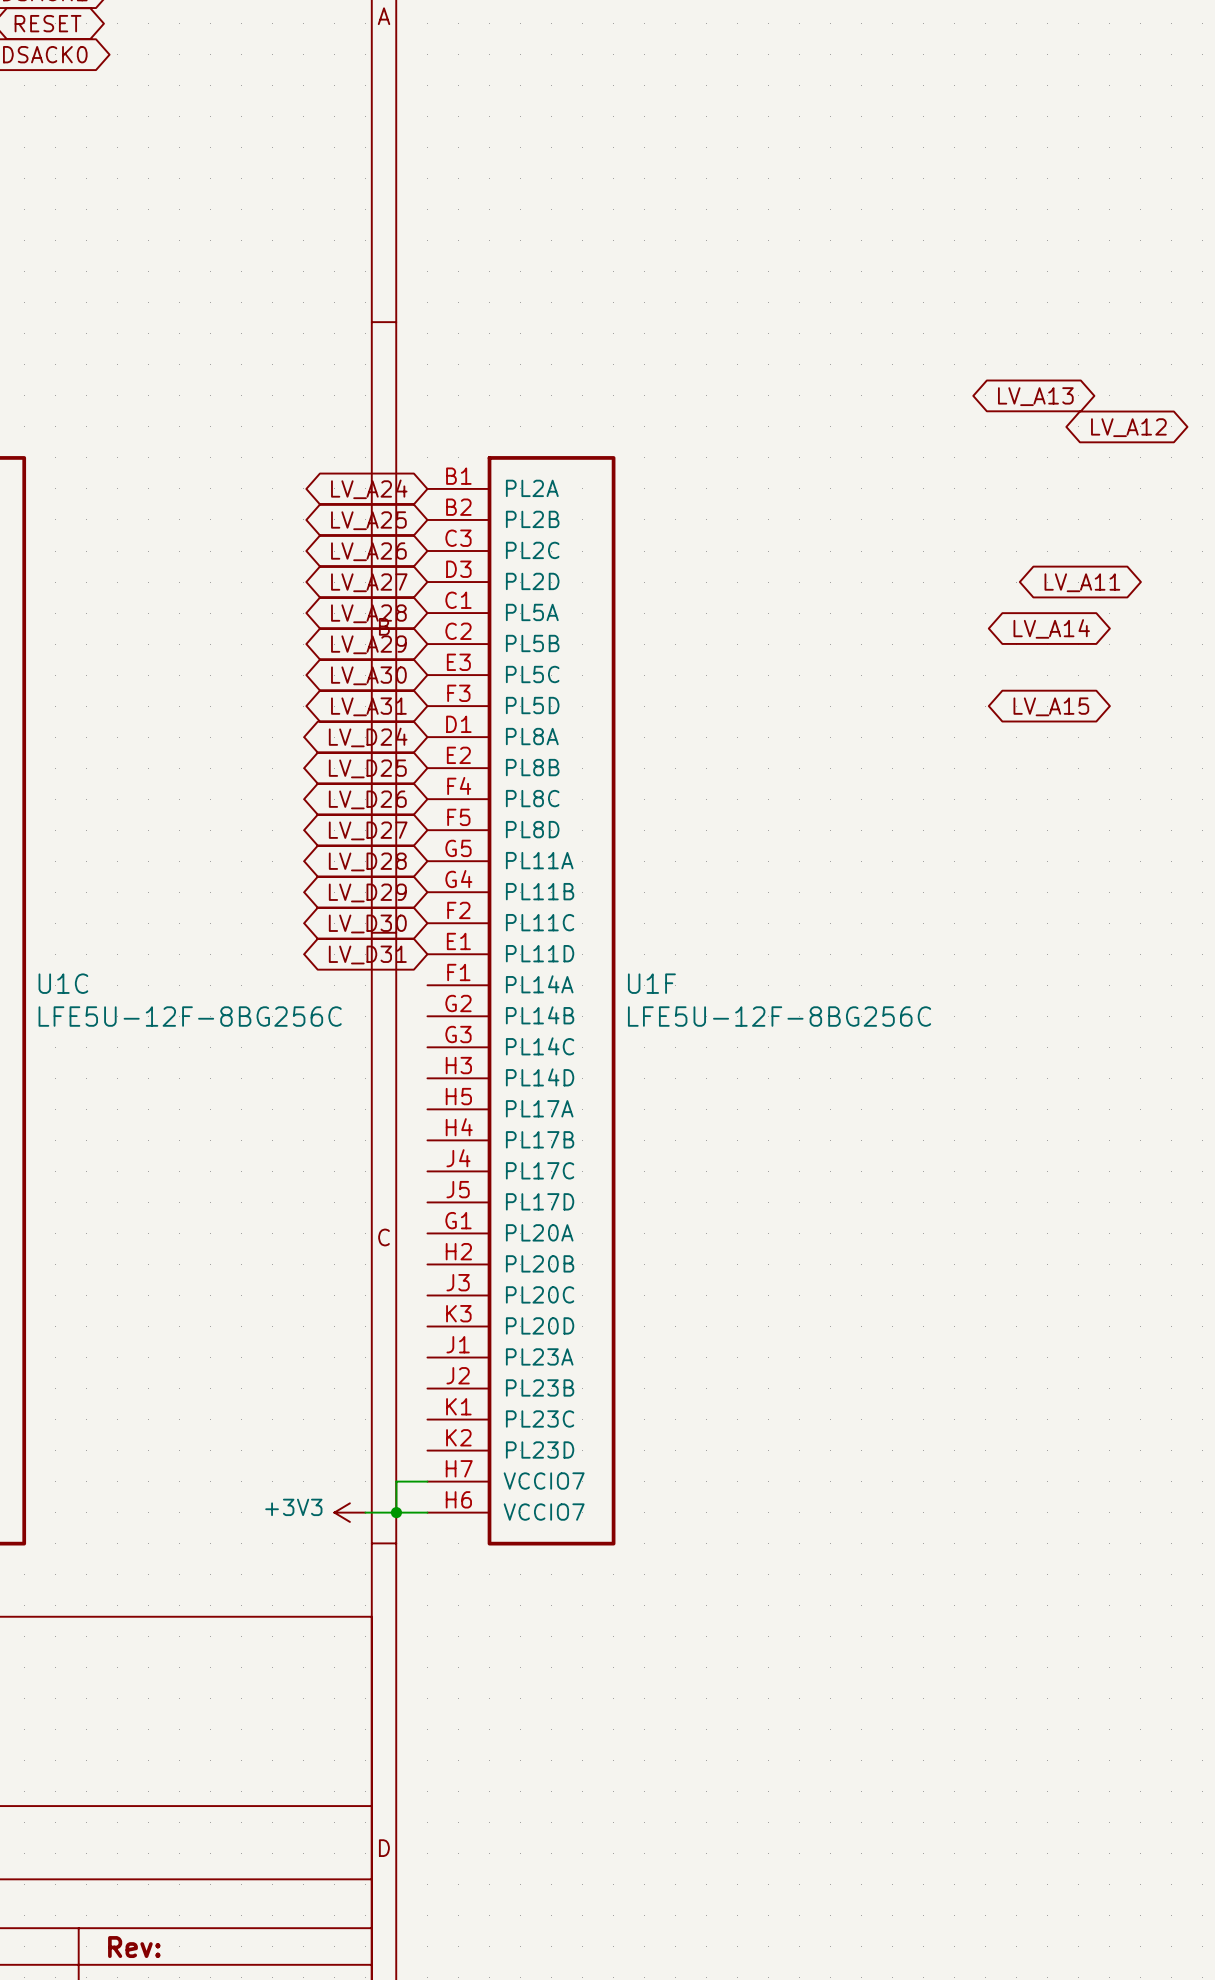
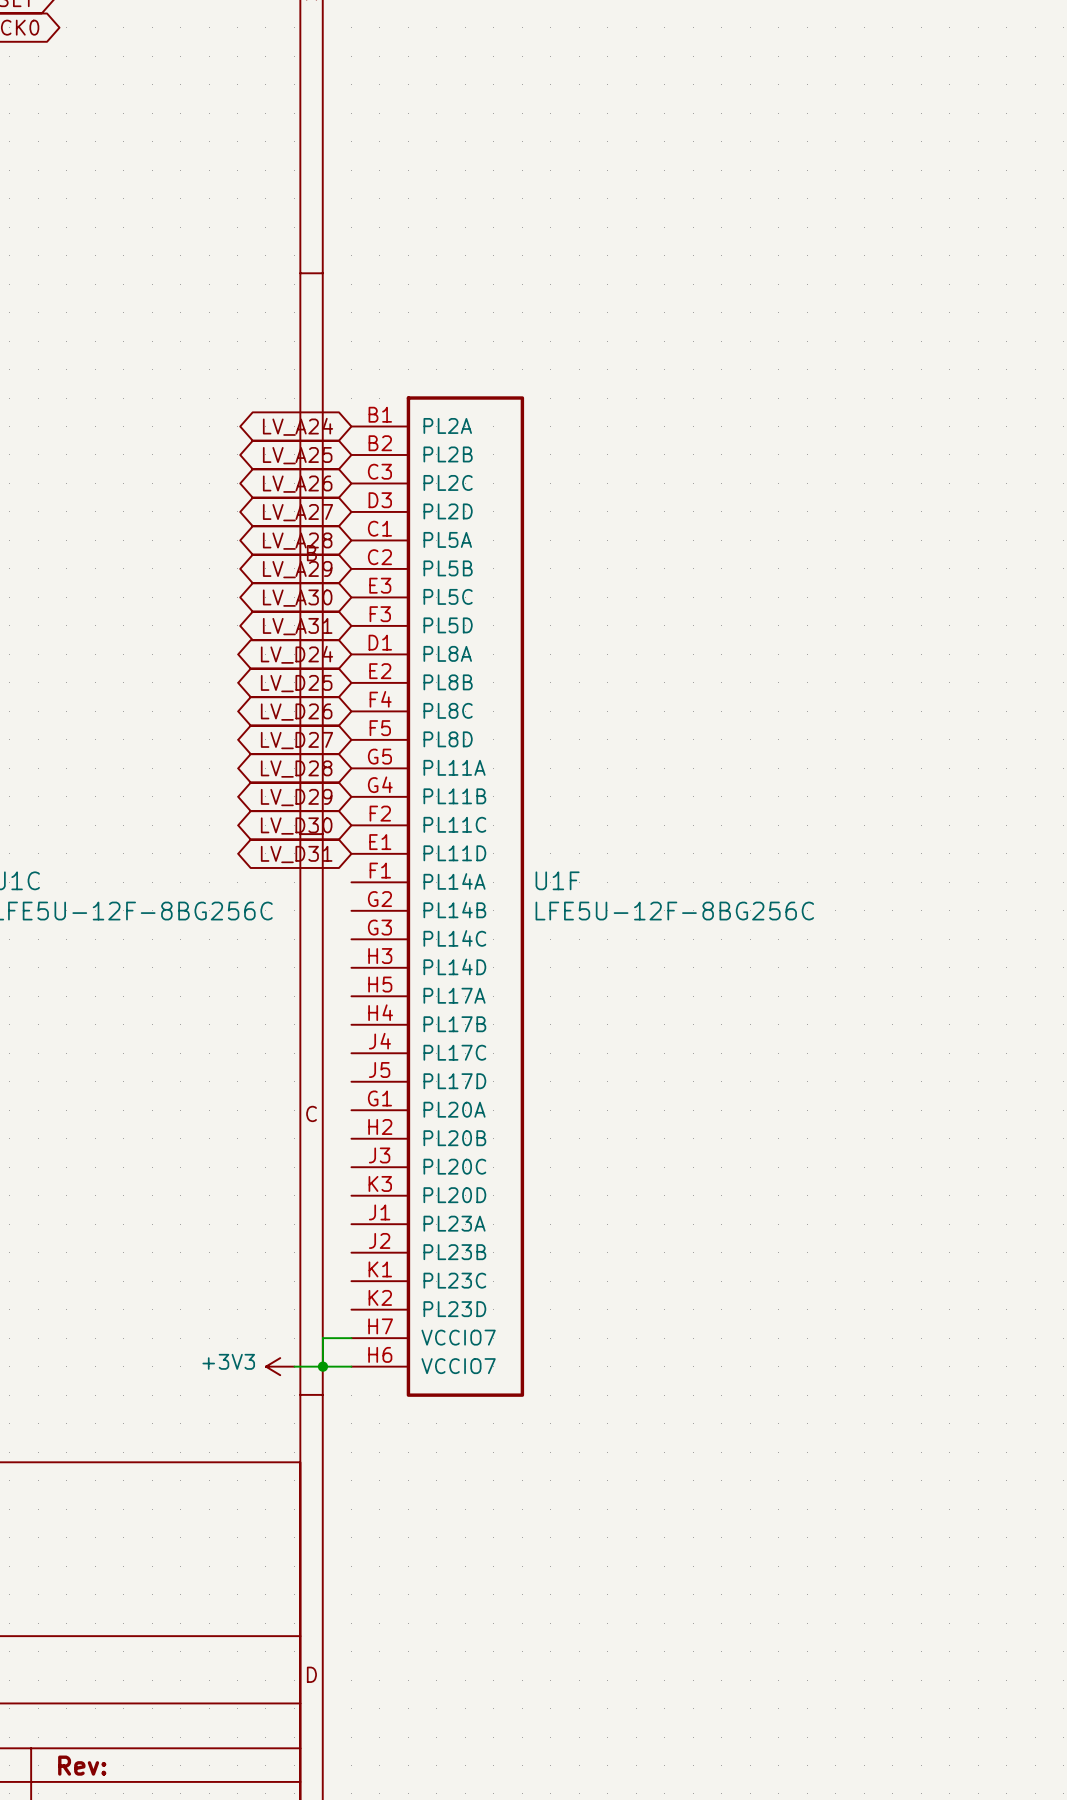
global label: LV_A13 (1035, 396) -> none
global label: LV_A12 (1128, 427) -> none
global label: LV_A11 (1082, 582) -> none
global label: LV_A14 (1051, 628) -> none
global label: LV_A15 (1051, 706) -> none

